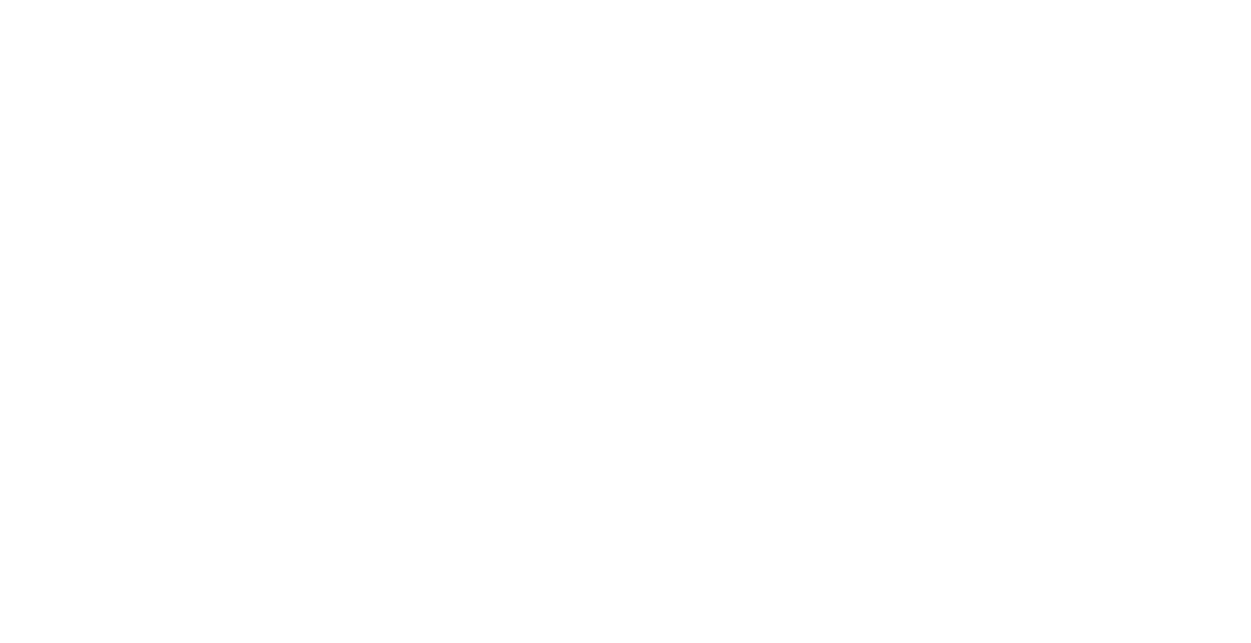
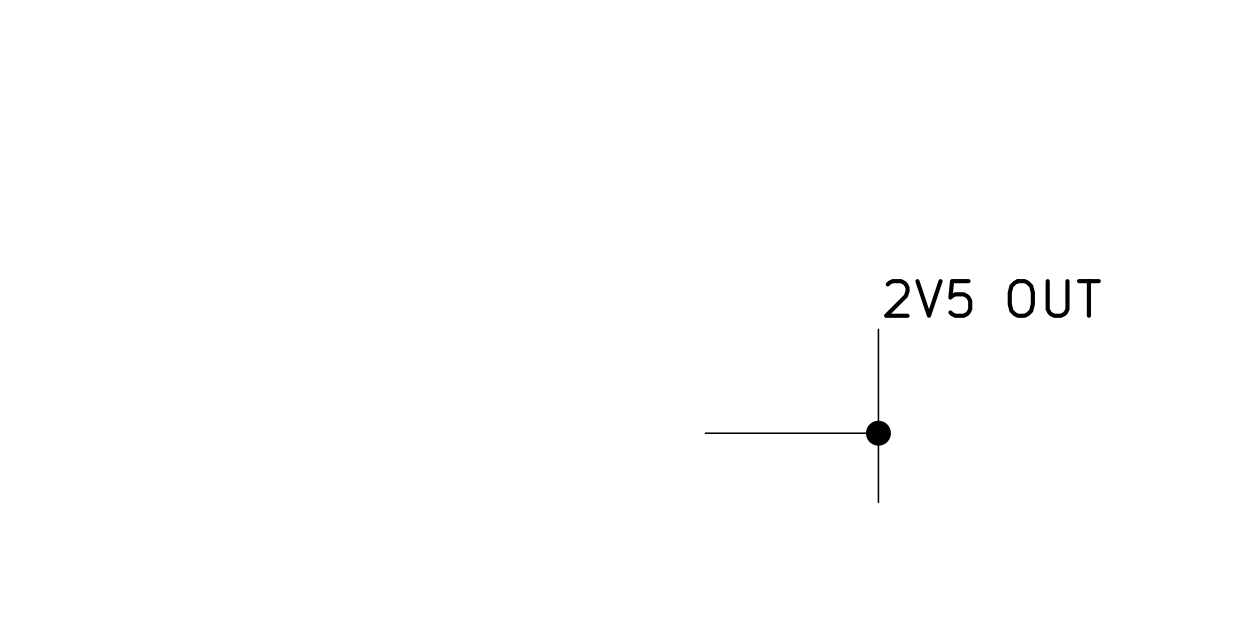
label: none -> 2V5 OUT (992, 298)
wire: none -> (878, 329) (878, 502)
wire: none -> (705, 433) (878, 433)
junction: none -> (878, 433)

